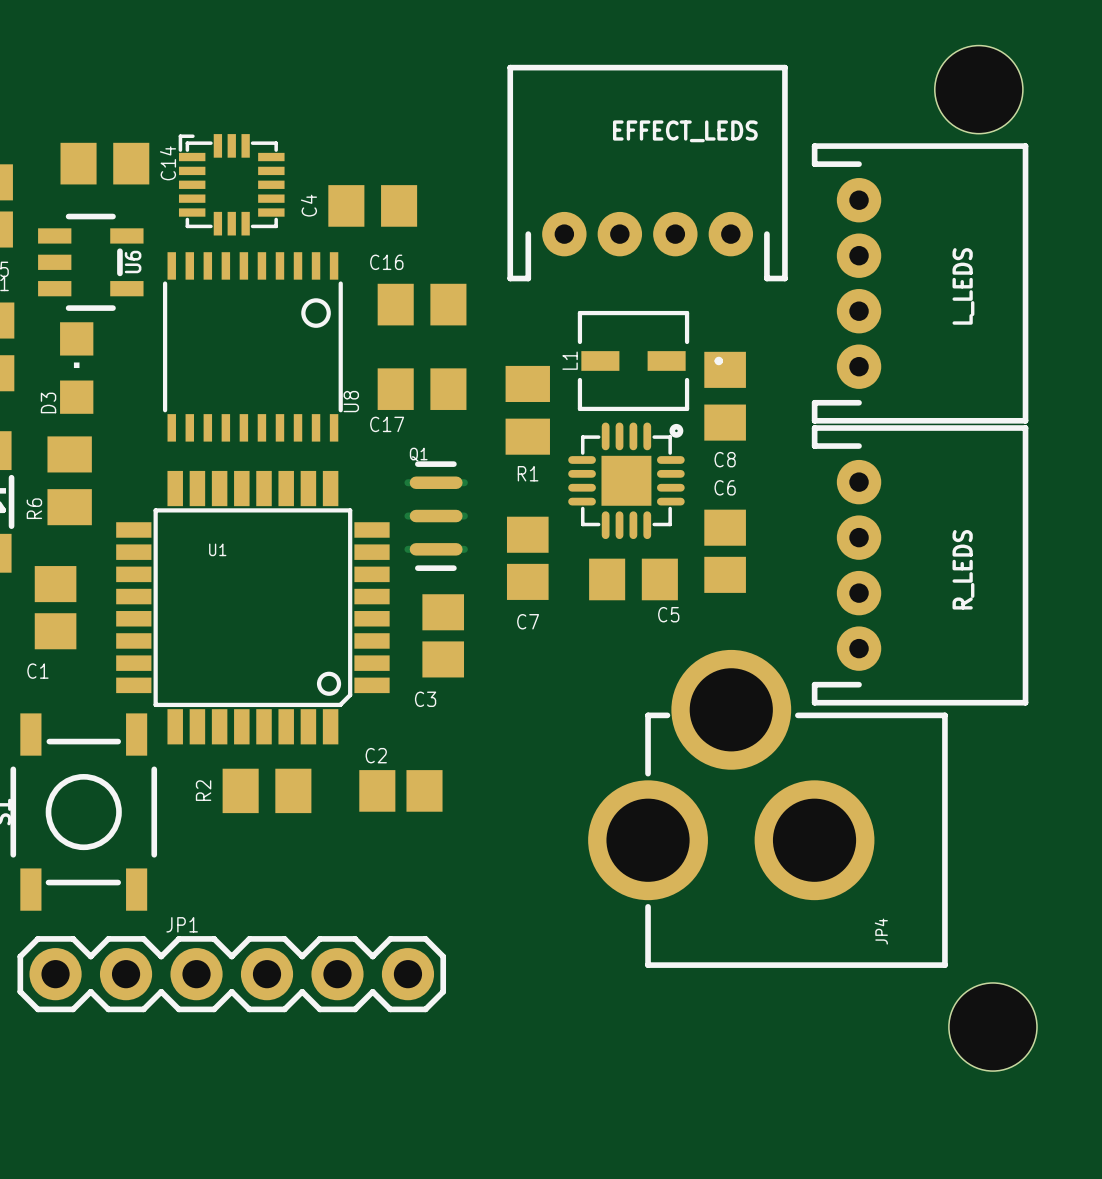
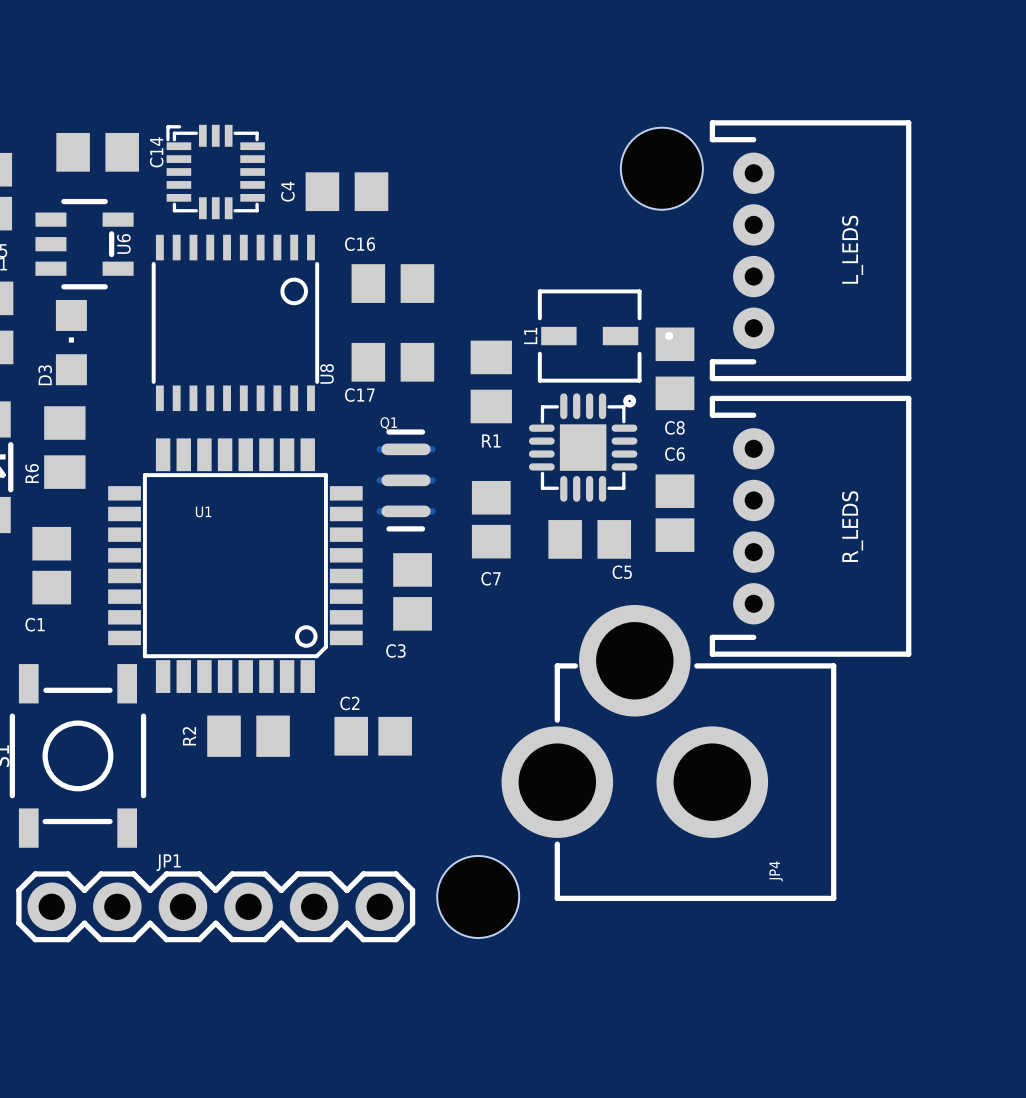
hole position: (978, 89) -> (661, 168)
EFFECT_LEDS: (647, 173) -> none
L_LEDS position: (920, 283) -> (810, 250)
R_LEDS position: (920, 565) -> (810, 526)
JP4 position: (767, 808) -> (668, 753)
hole: none -> (478, 896)
hole: (992, 1027) -> none

